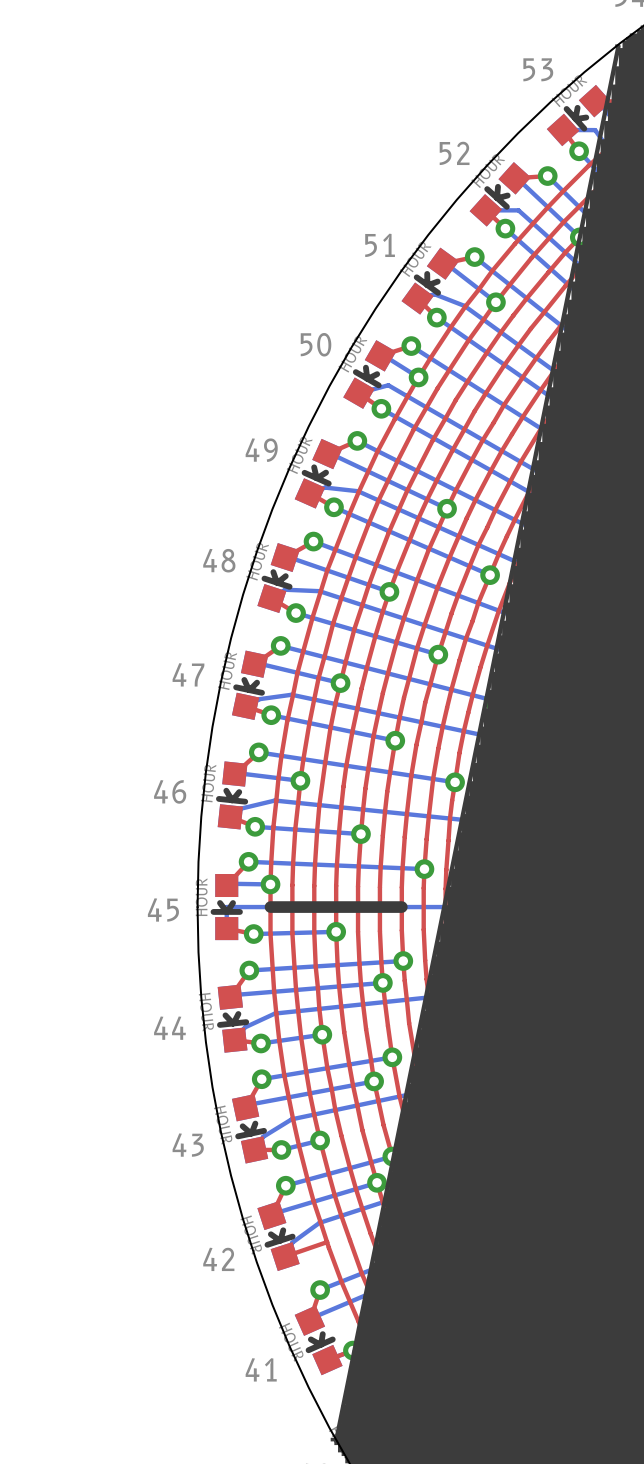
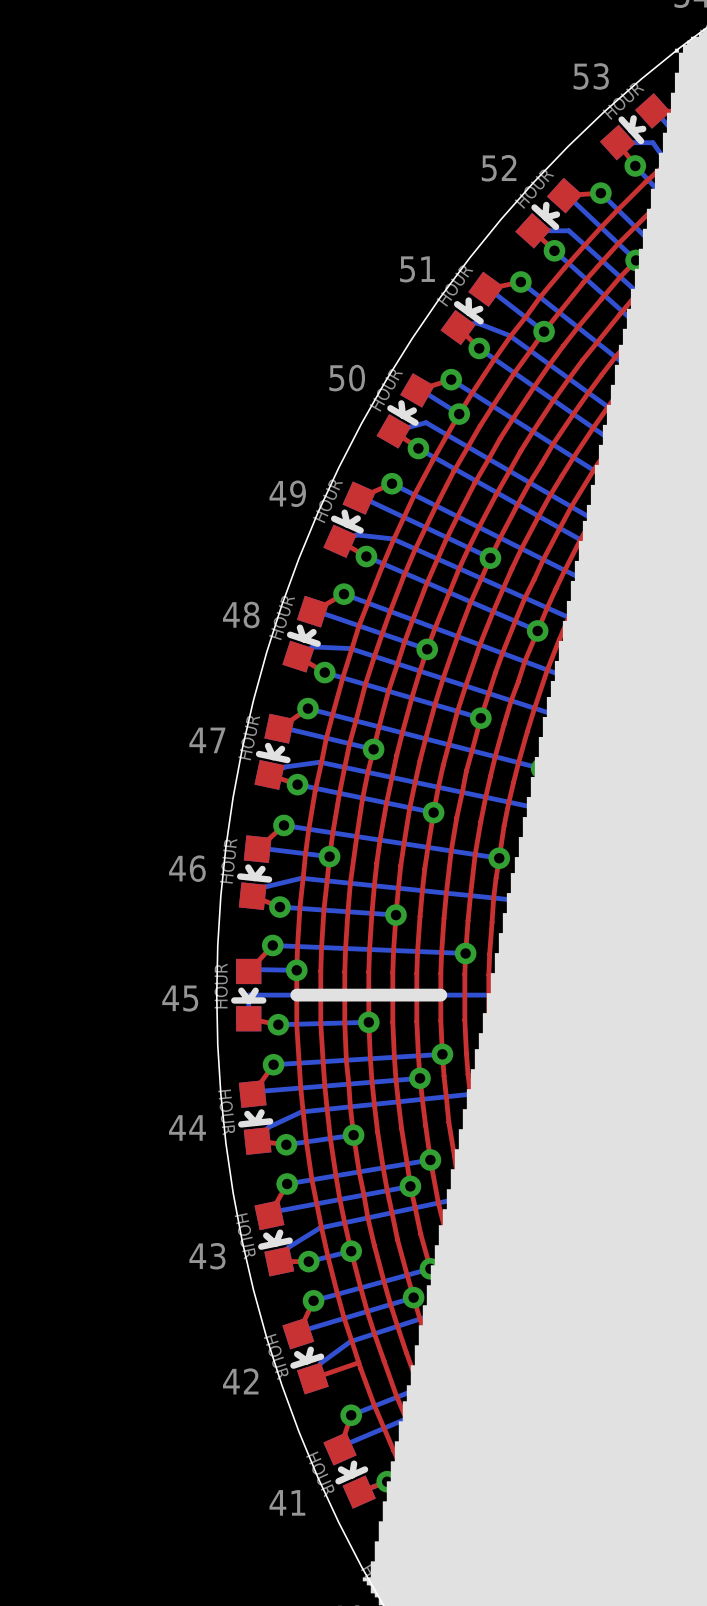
line: (618, 46) (336, 1441) -> none

